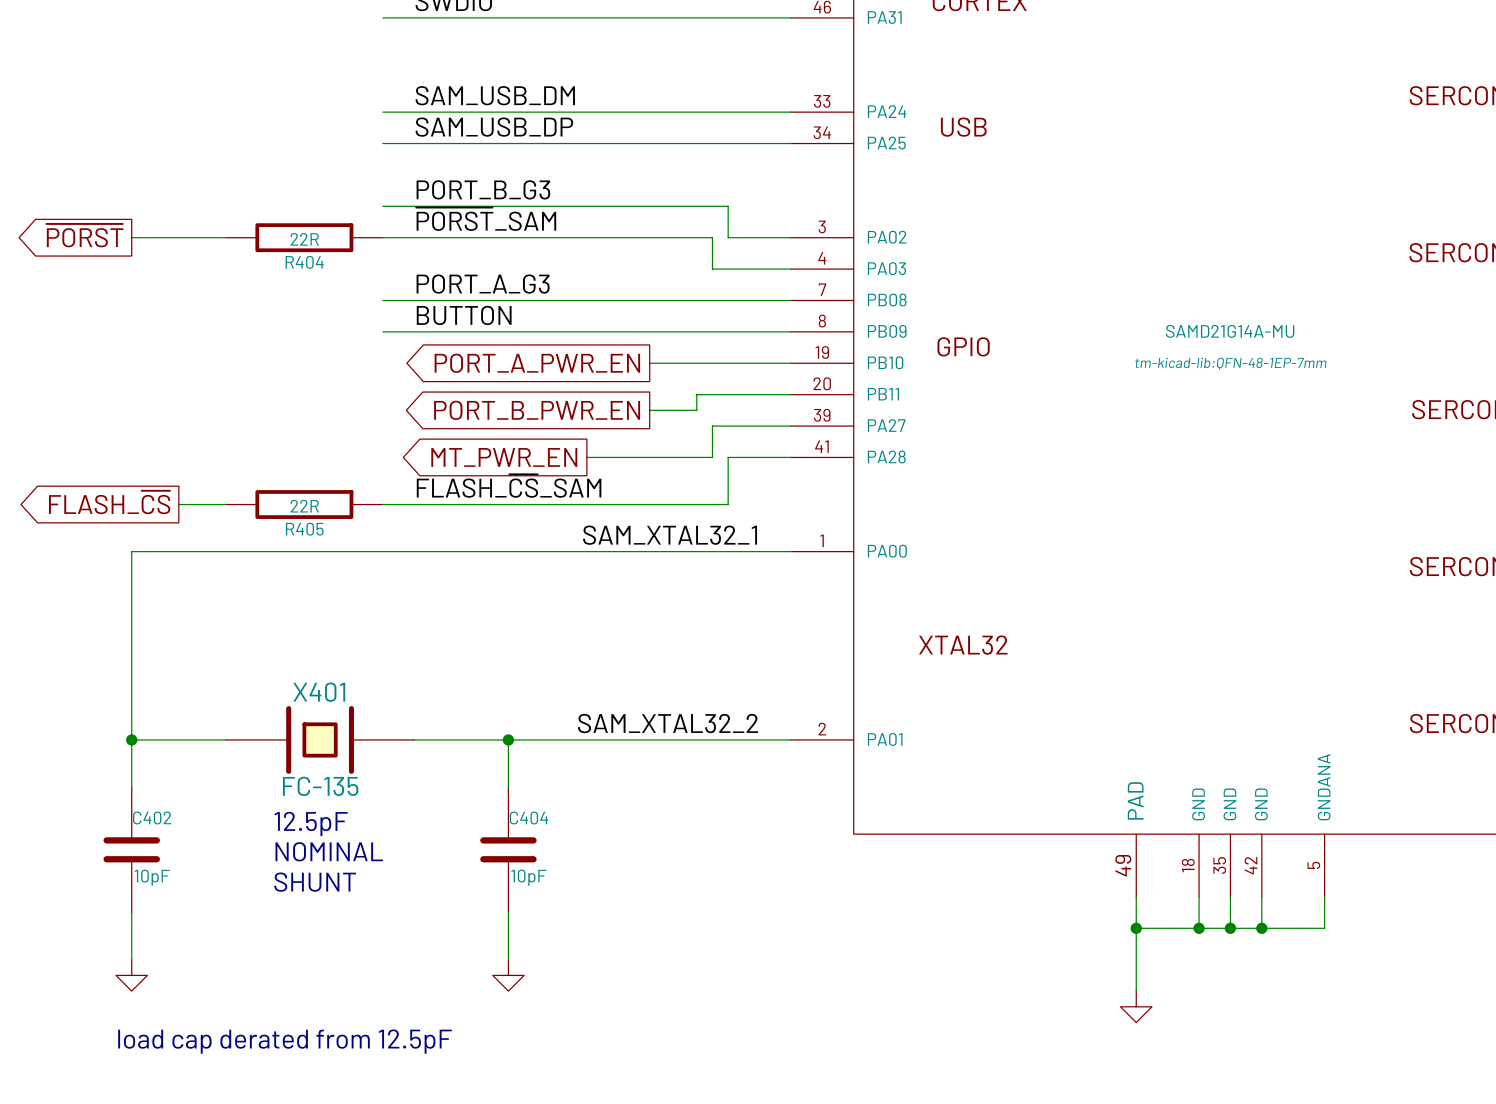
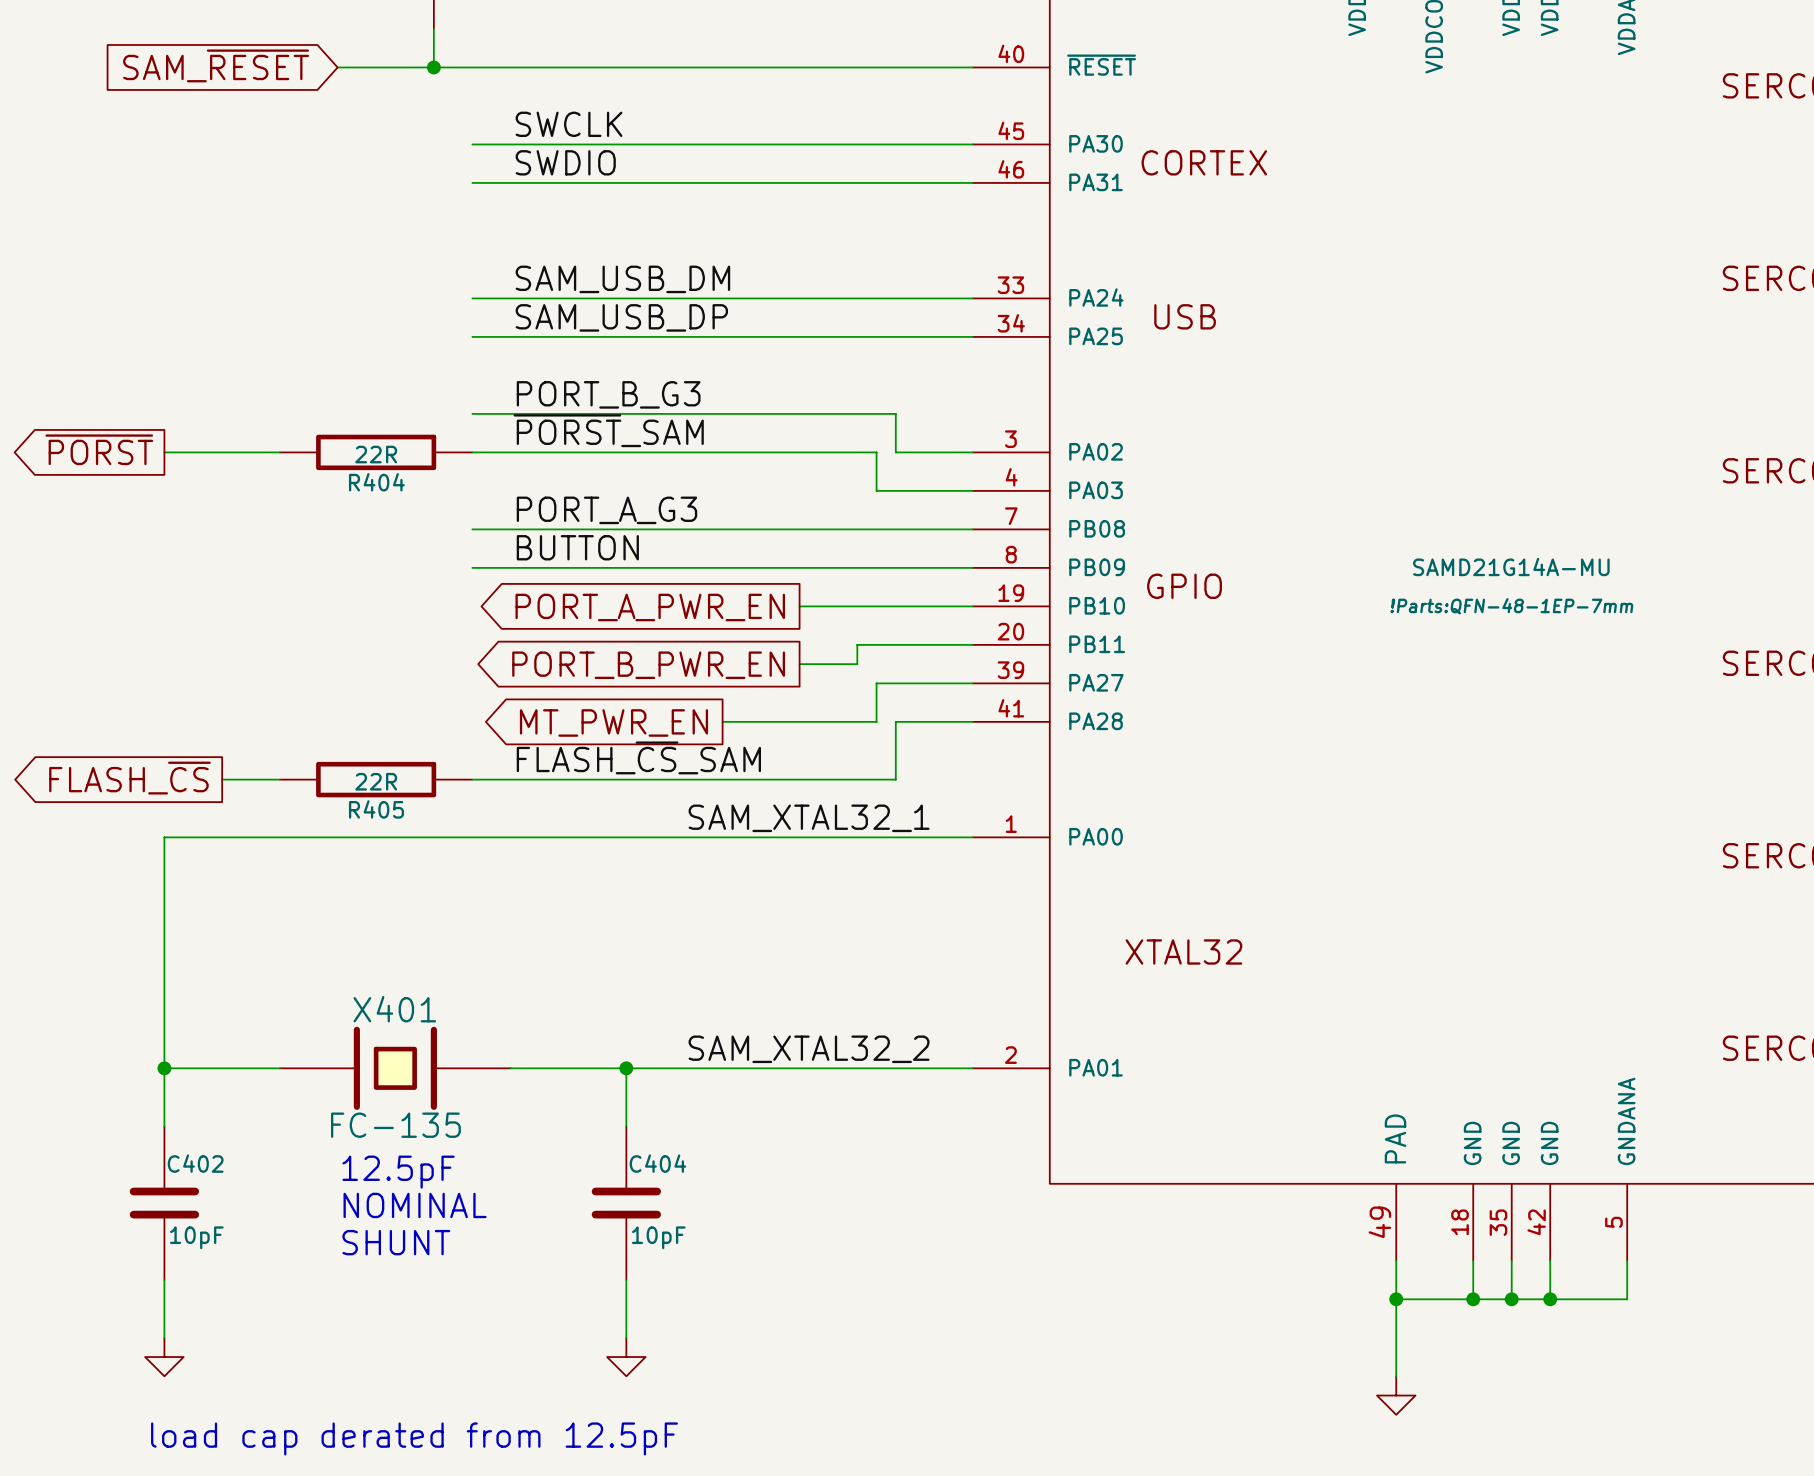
part text: tm-kicad-lib:QFN-48-1EP-7mm (1230, 363) -> !Parts:QFN-48-1EP-7mm (1511, 606)

